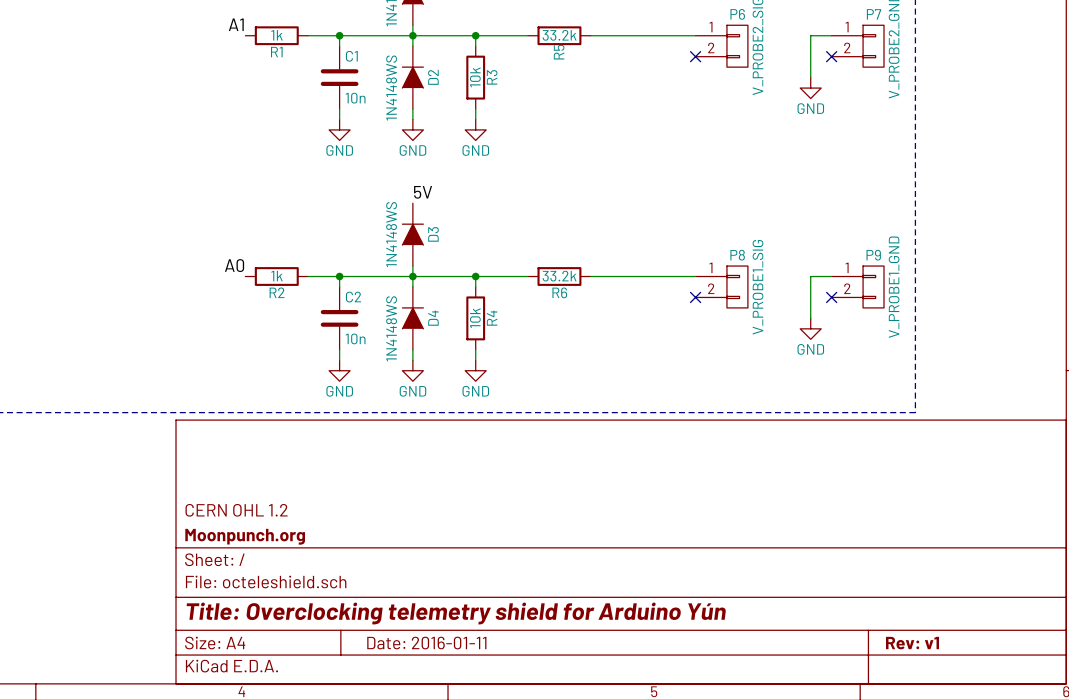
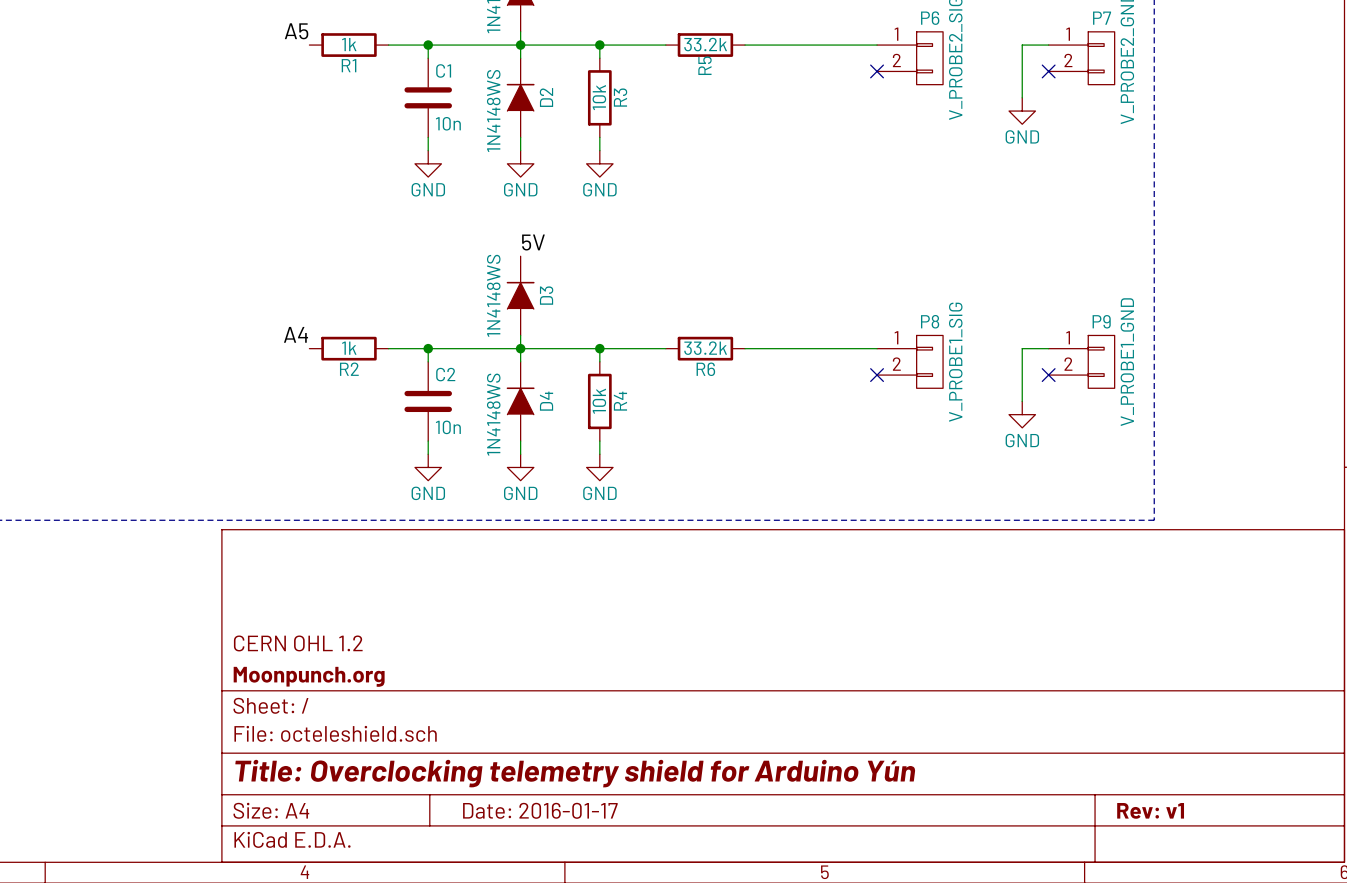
label: A1 (236, 24) -> A5 (296, 31)
label: A0 (234, 265) -> A4 (295, 334)
title block: Date: 2016-01-11 (426, 643) -> Date: 2016-01-17 (540, 810)

